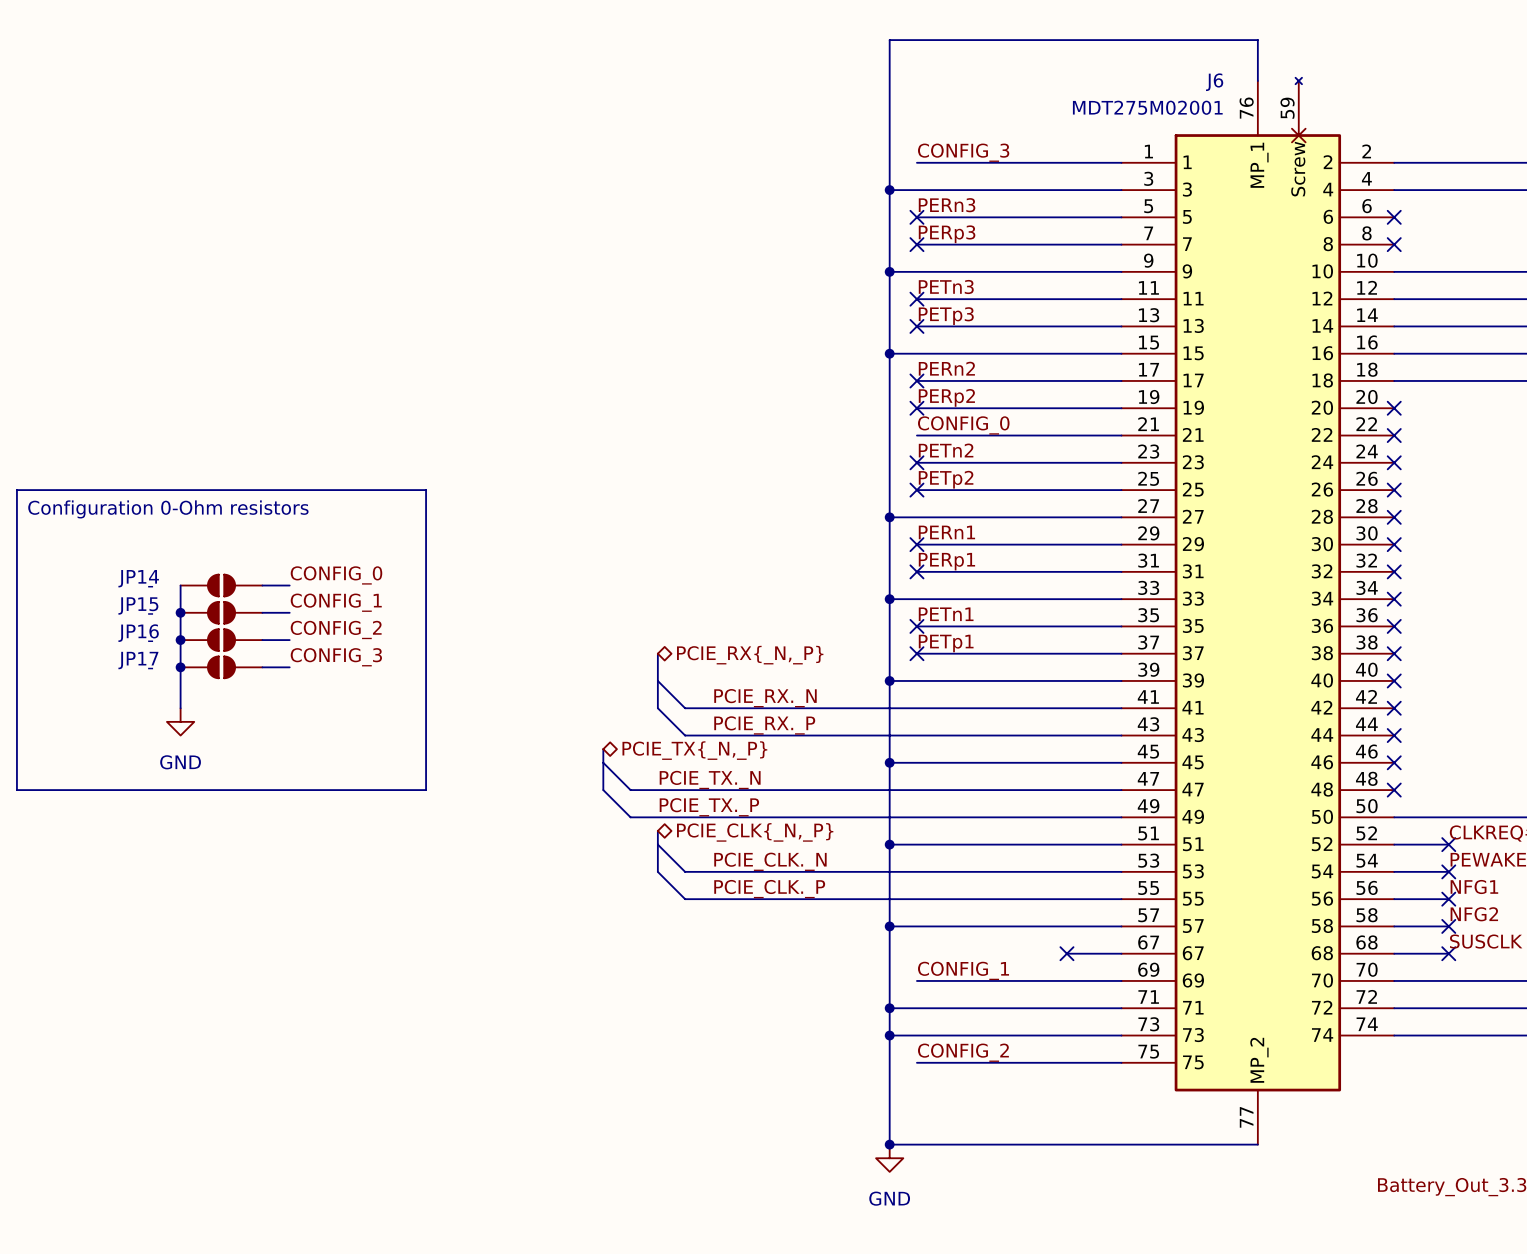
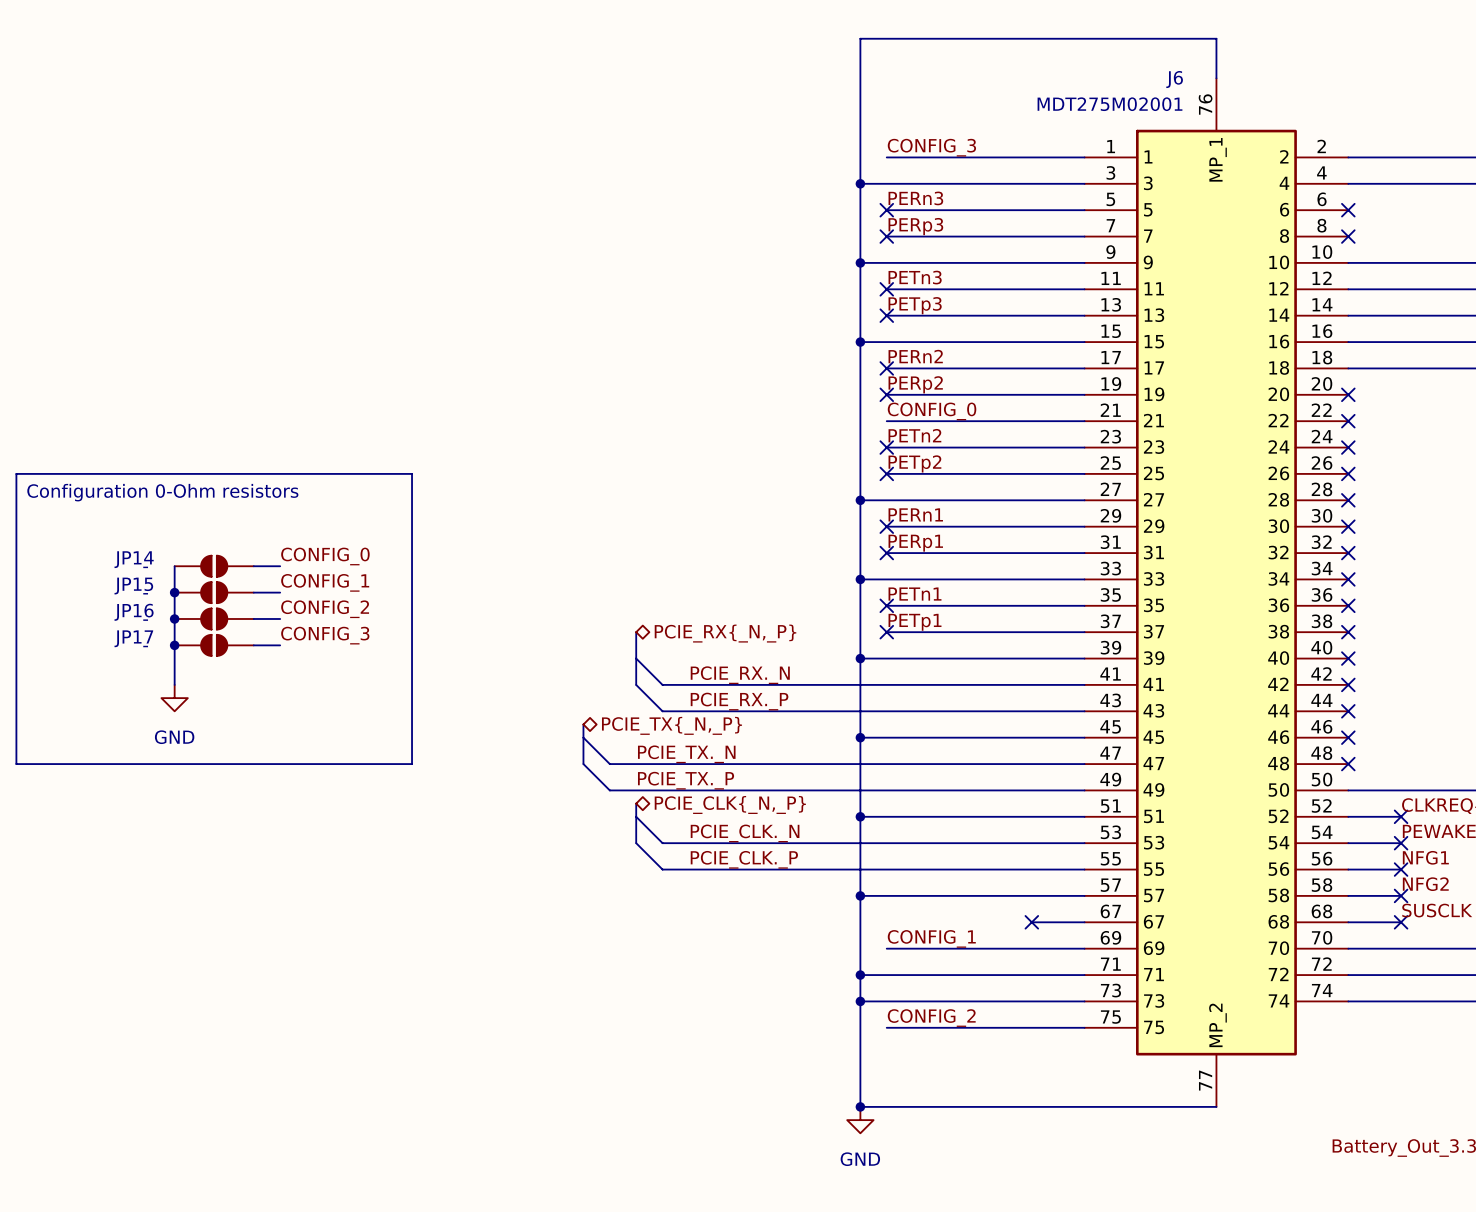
J6 symbol: [1121, 77, 1395, 1145] -> [1084, 78, 1349, 1107]

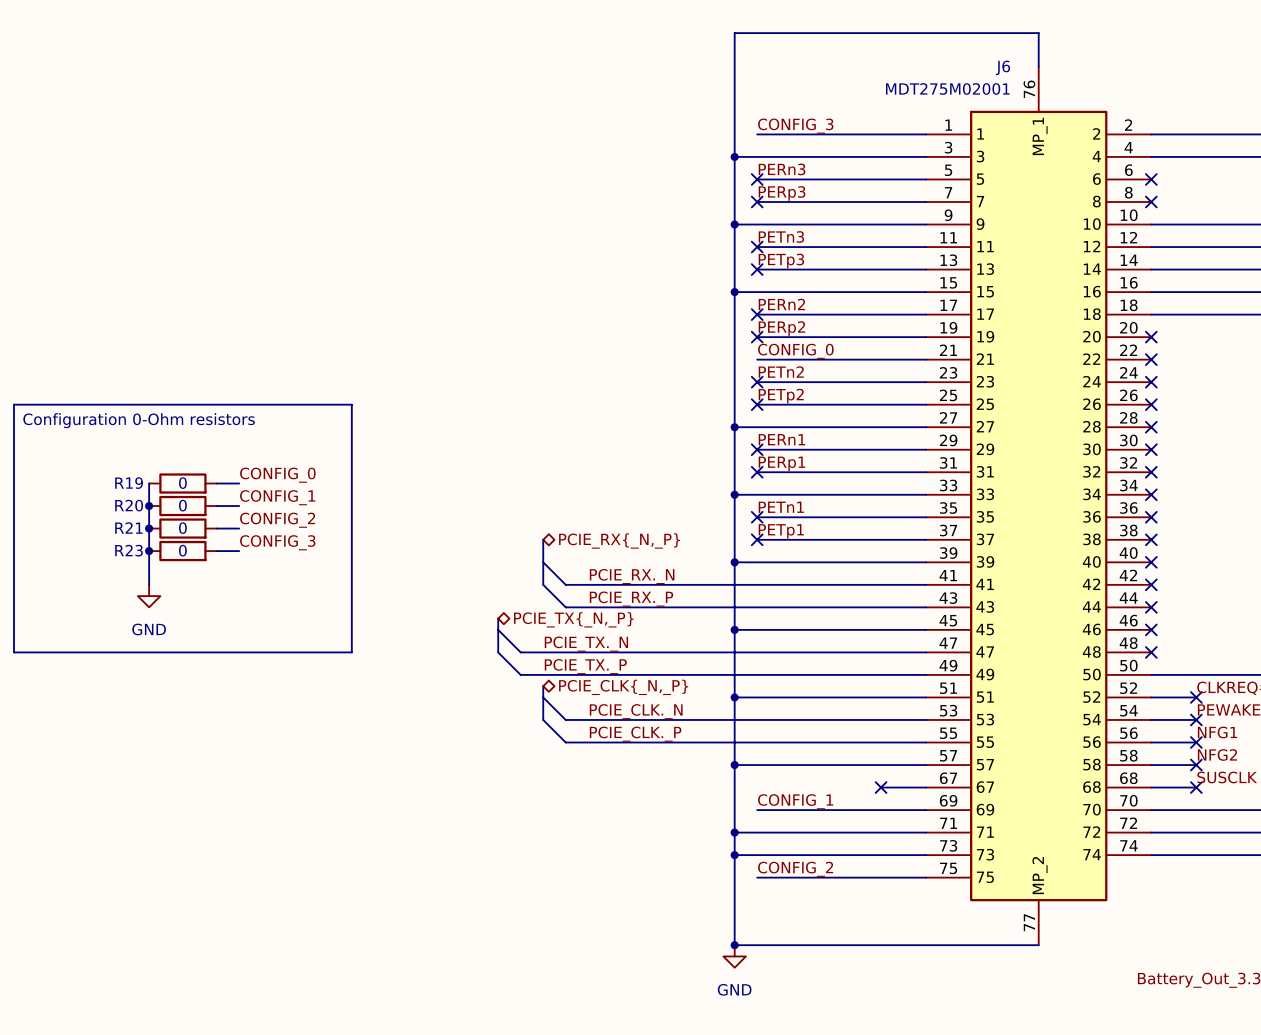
JP14: - (214, 566) -> none
R19: none -> 0 (182, 483)
JP15: - (214, 592) -> none
R20: none -> 0 (182, 506)
JP16: - (214, 618) -> none
R21: none -> 0 (182, 528)
JP17: - (214, 645) -> none
R23: none -> 0 (182, 551)

